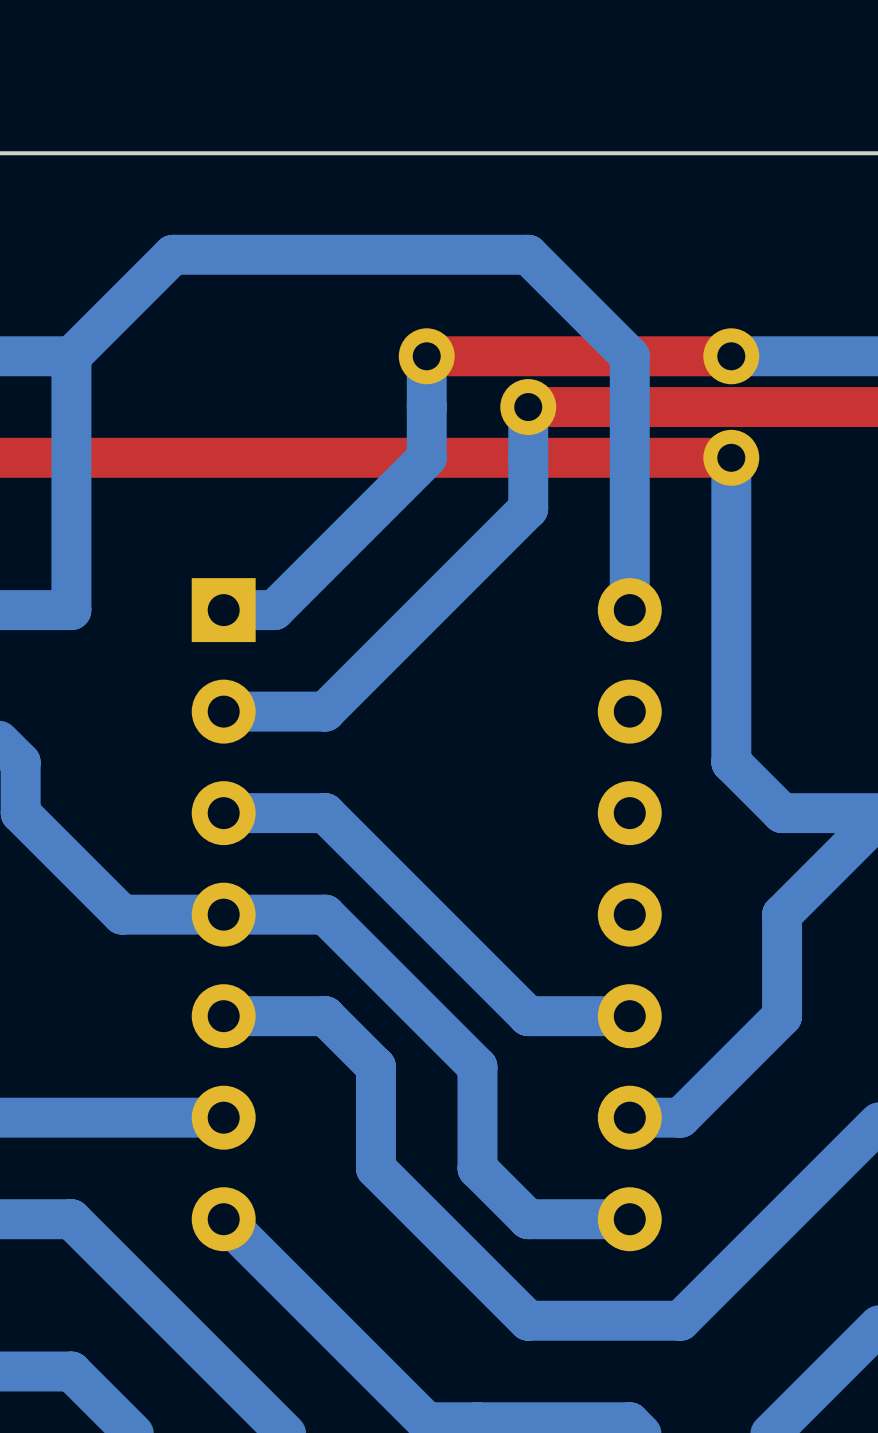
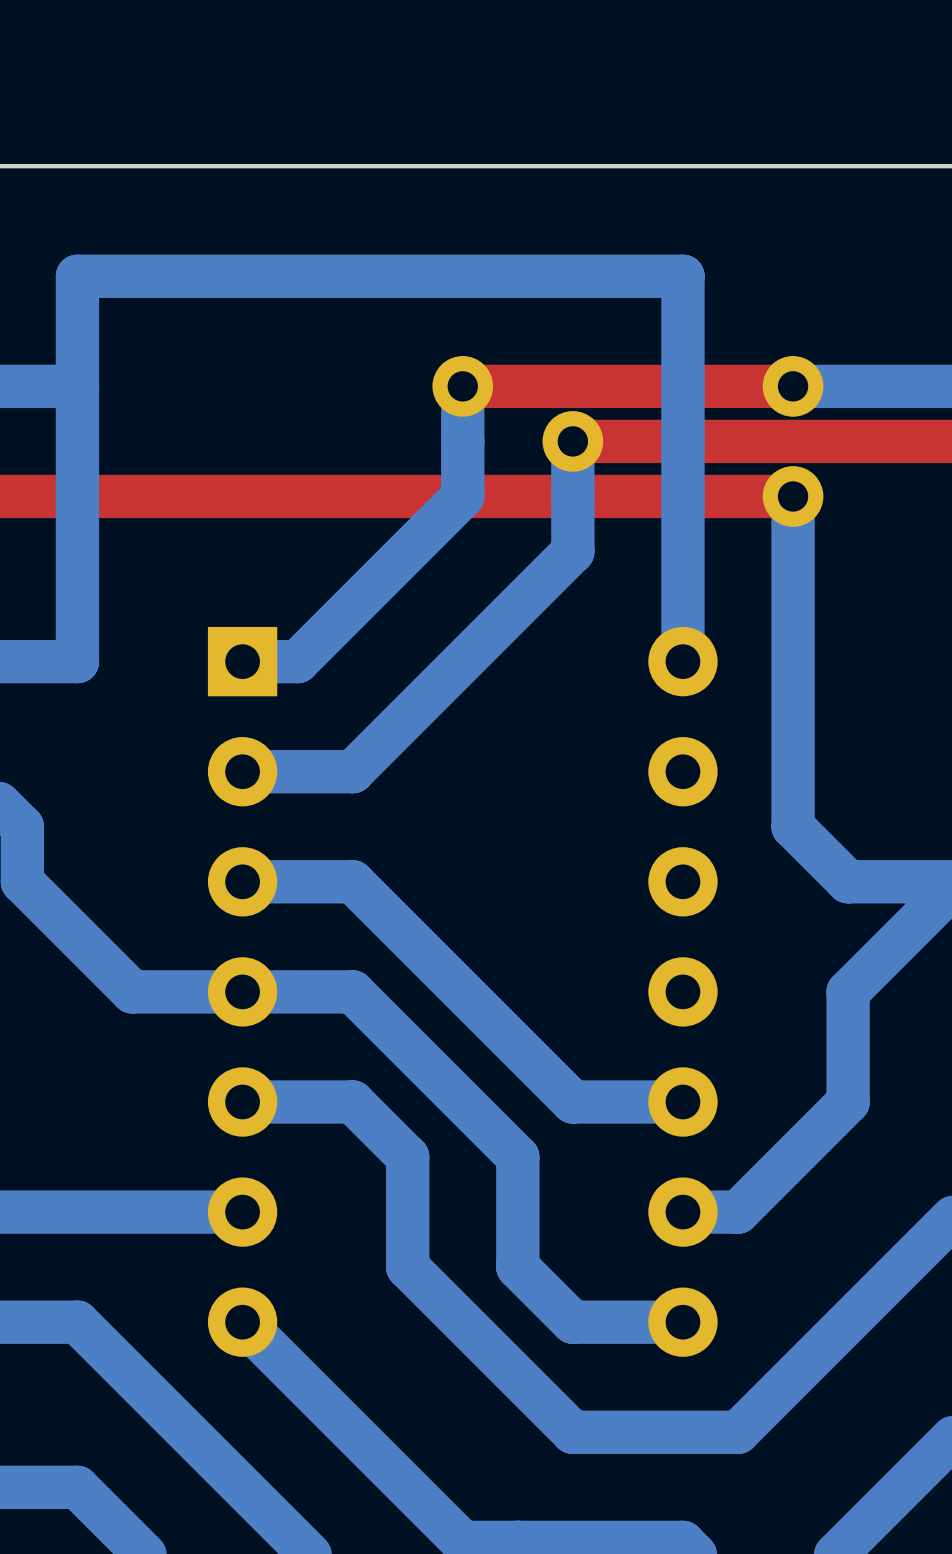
bottom track: (172, 254) (71, 356) -> (187, 276) (77, 276) (77, 386)
bottom track: (528, 254) (629, 356) -> (572, 276) (682, 276) (682, 386)

